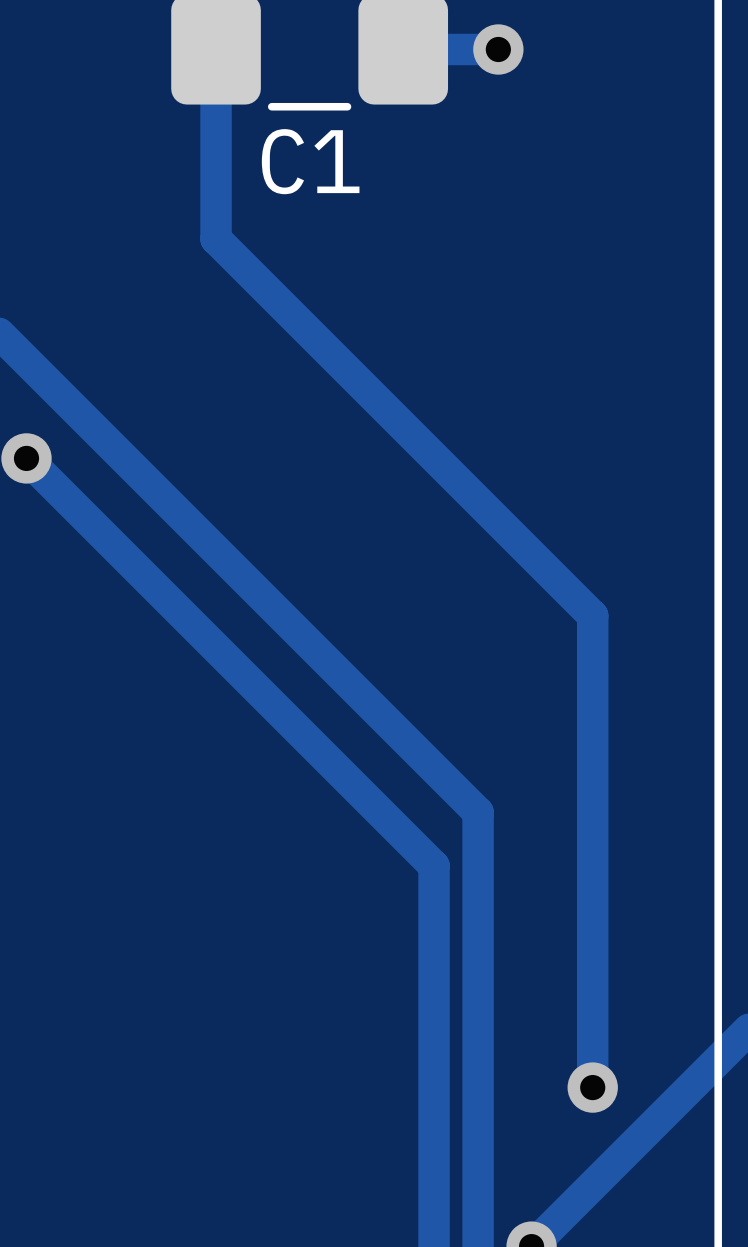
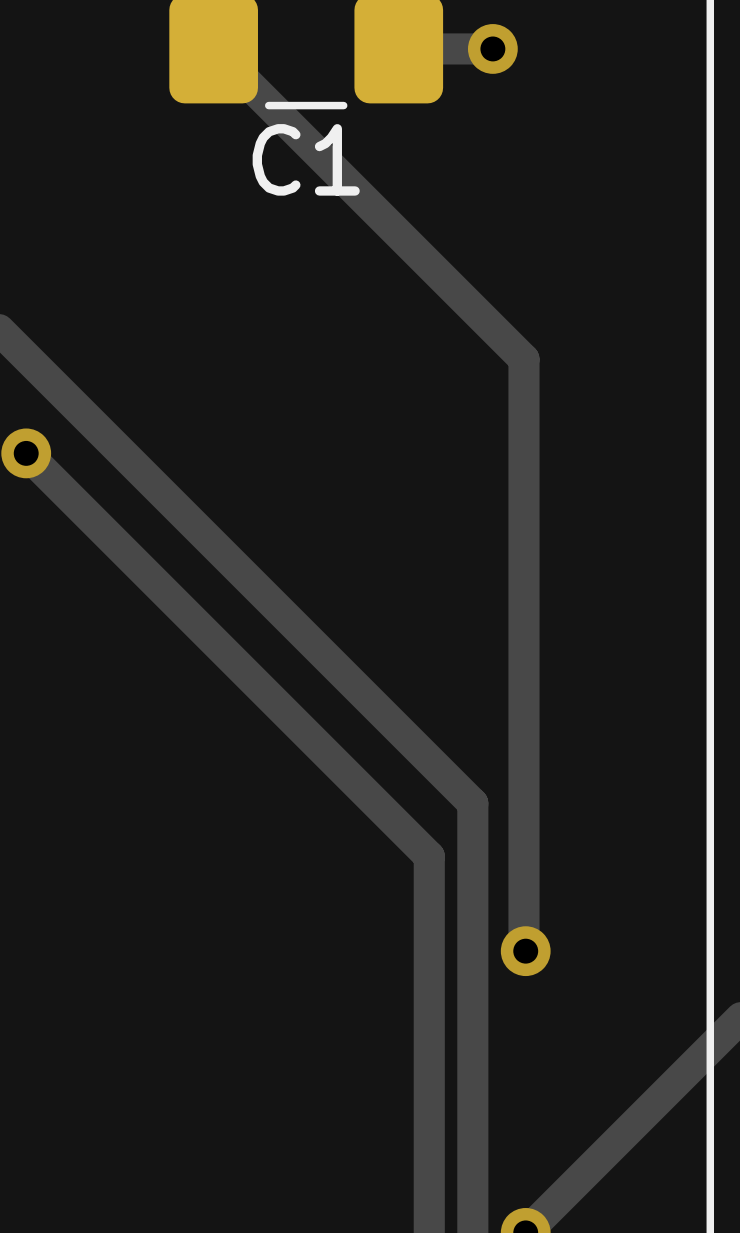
track: (216, 49) (216, 239) (592, 615) (592, 1087) -> (213, 48) (523, 359) (523, 949) (525, 951)
via position: (592, 1087) -> (525, 951)

